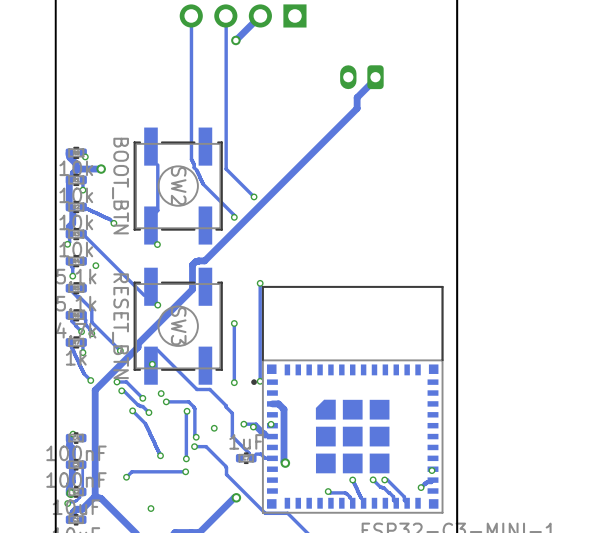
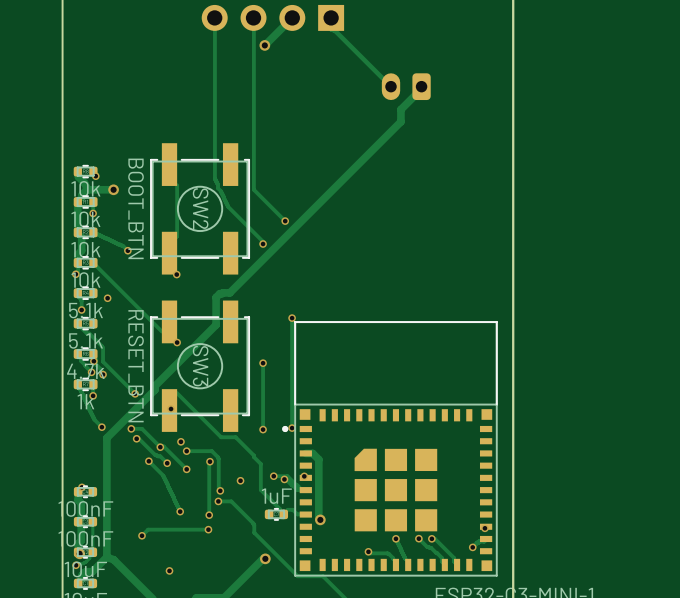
track: none -> (331, 17) (331, 29) (335, 30) (391, 86)
via: none -> (93, 361)
track: none -> (160, 447) (163, 446) (186, 469)
via: none -> (186, 469)

